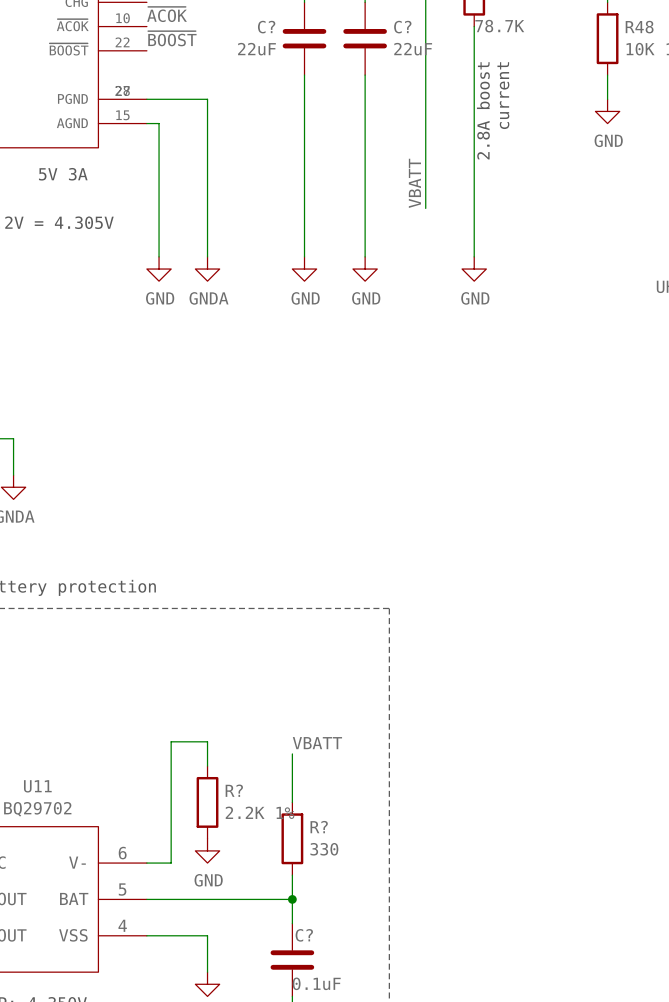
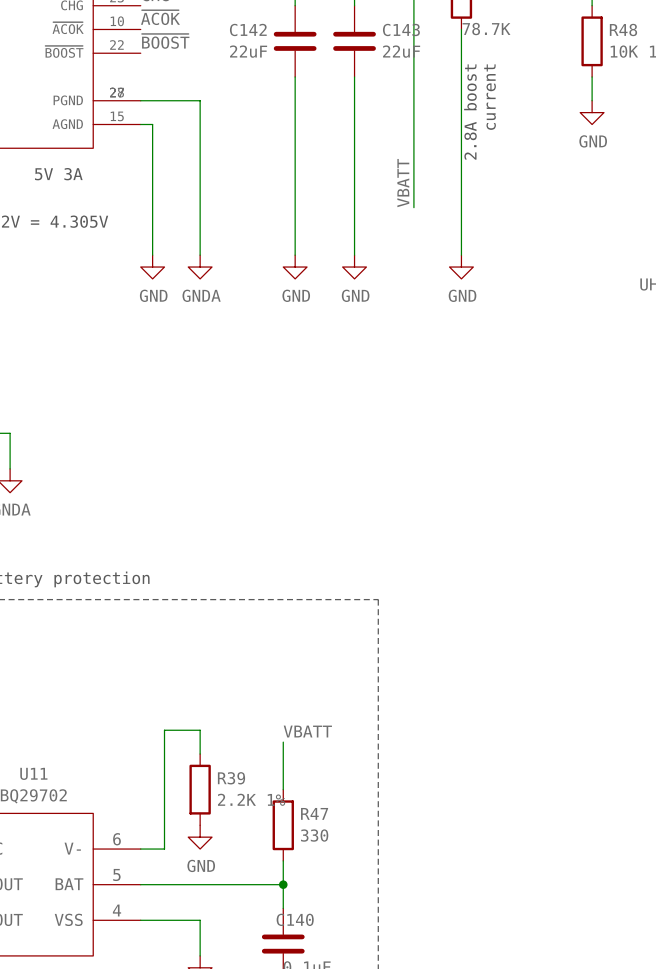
C? name: C? (266, 27) -> C142 (248, 29)
C? name: C? (402, 27) -> C143 (401, 29)
R? name: R? (234, 790) -> R39 (231, 778)
R? name: R? (319, 827) -> R47 (314, 813)
C? name: C? (304, 935) -> C140 (295, 919)

